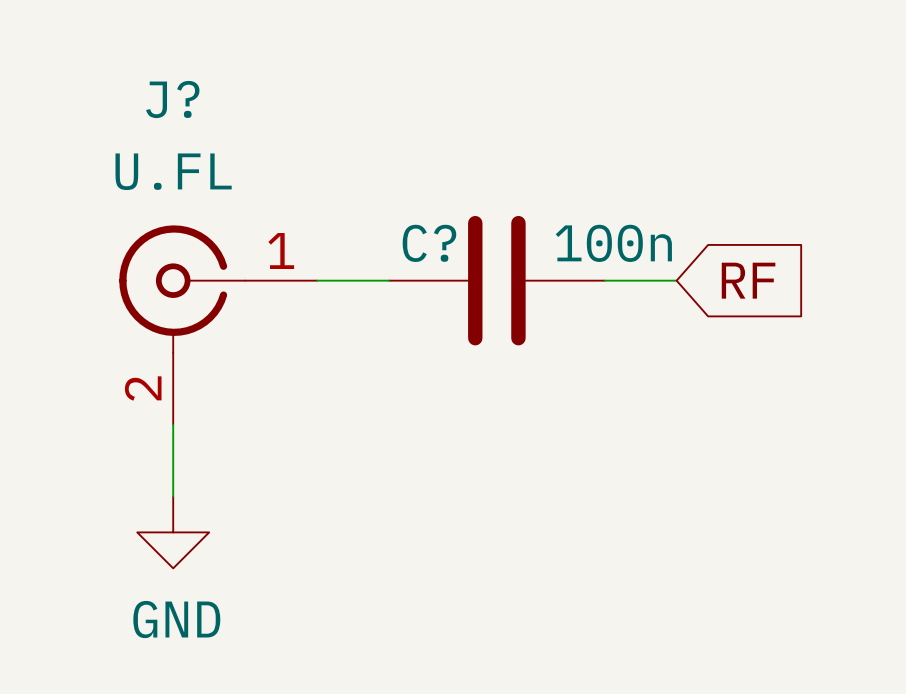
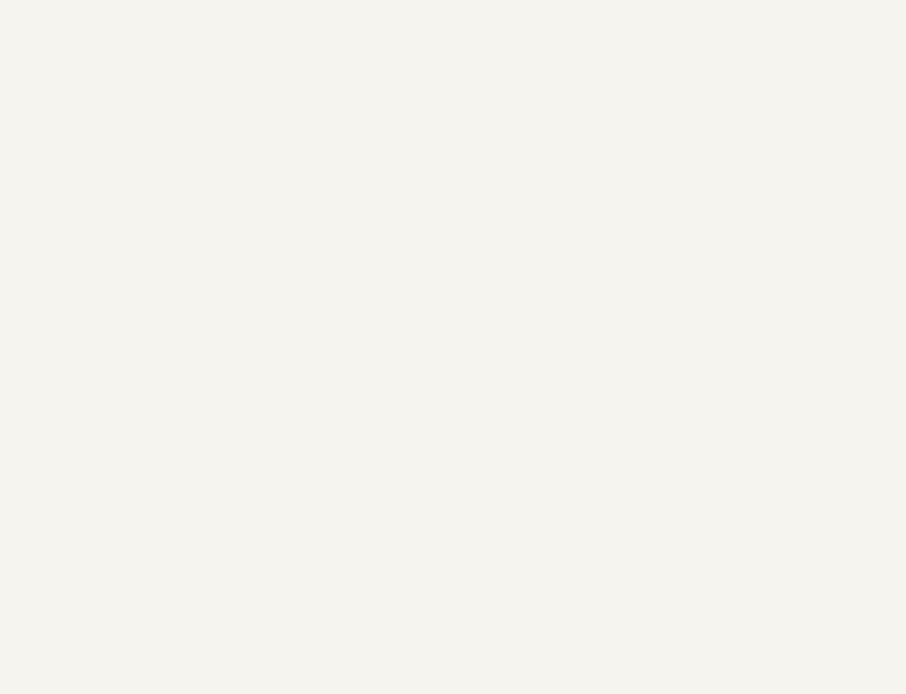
wire: (317, 280) (388, 280) -> none
C?: 100n (496, 280) -> none
wire: (604, 280) (676, 280) -> none
global label: RF (748, 280) -> none
J?: U.FL (218, 324) -> none
wire: (173, 424) (173, 496) -> none
power symbol: GND (173, 532) -> none

